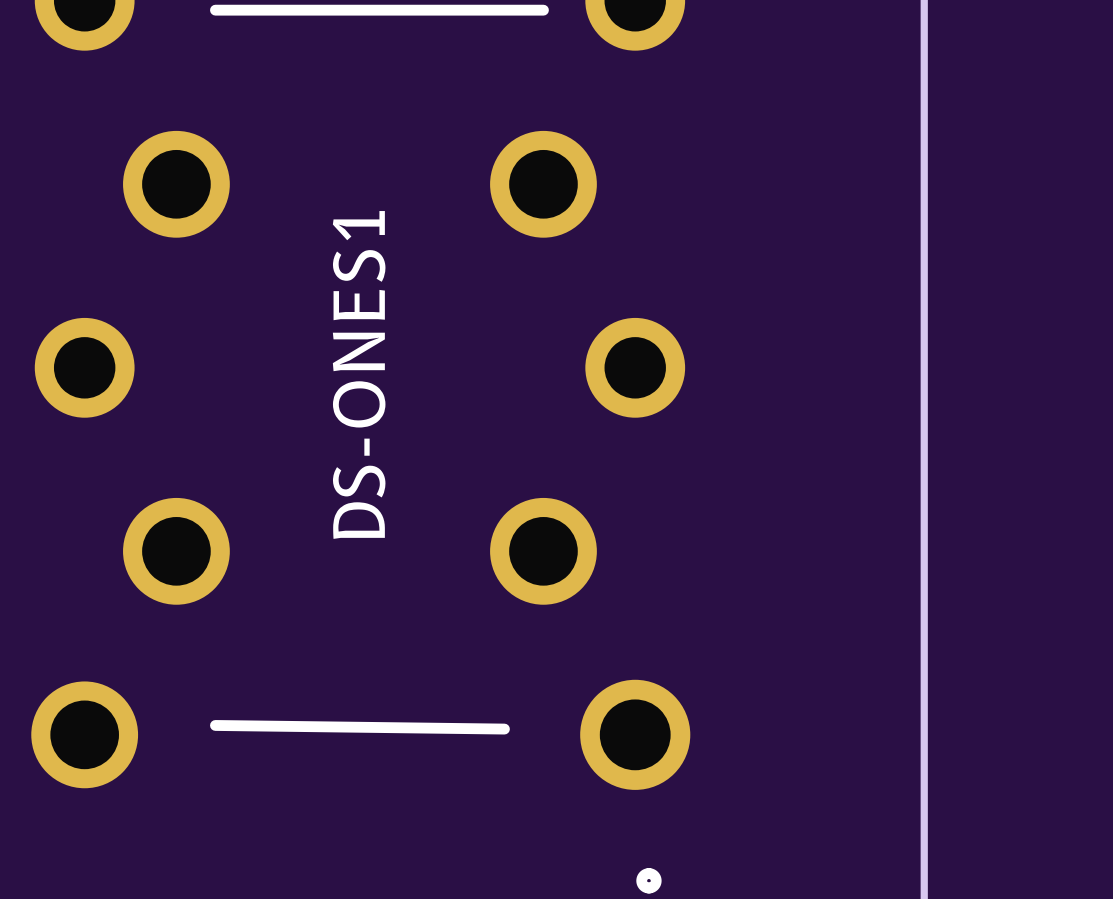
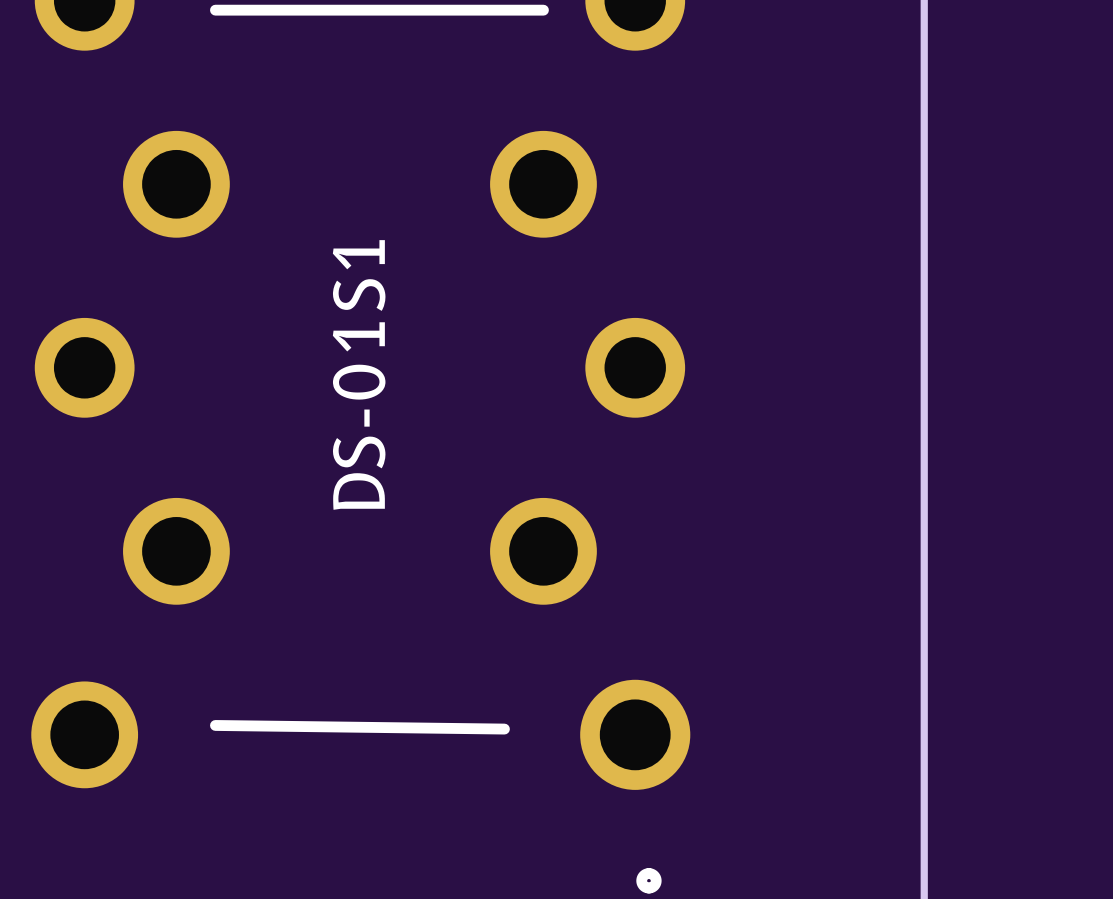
DS-ONES1 name: DS-ONES1 (359, 374) -> DS-01S1 (359, 374)

